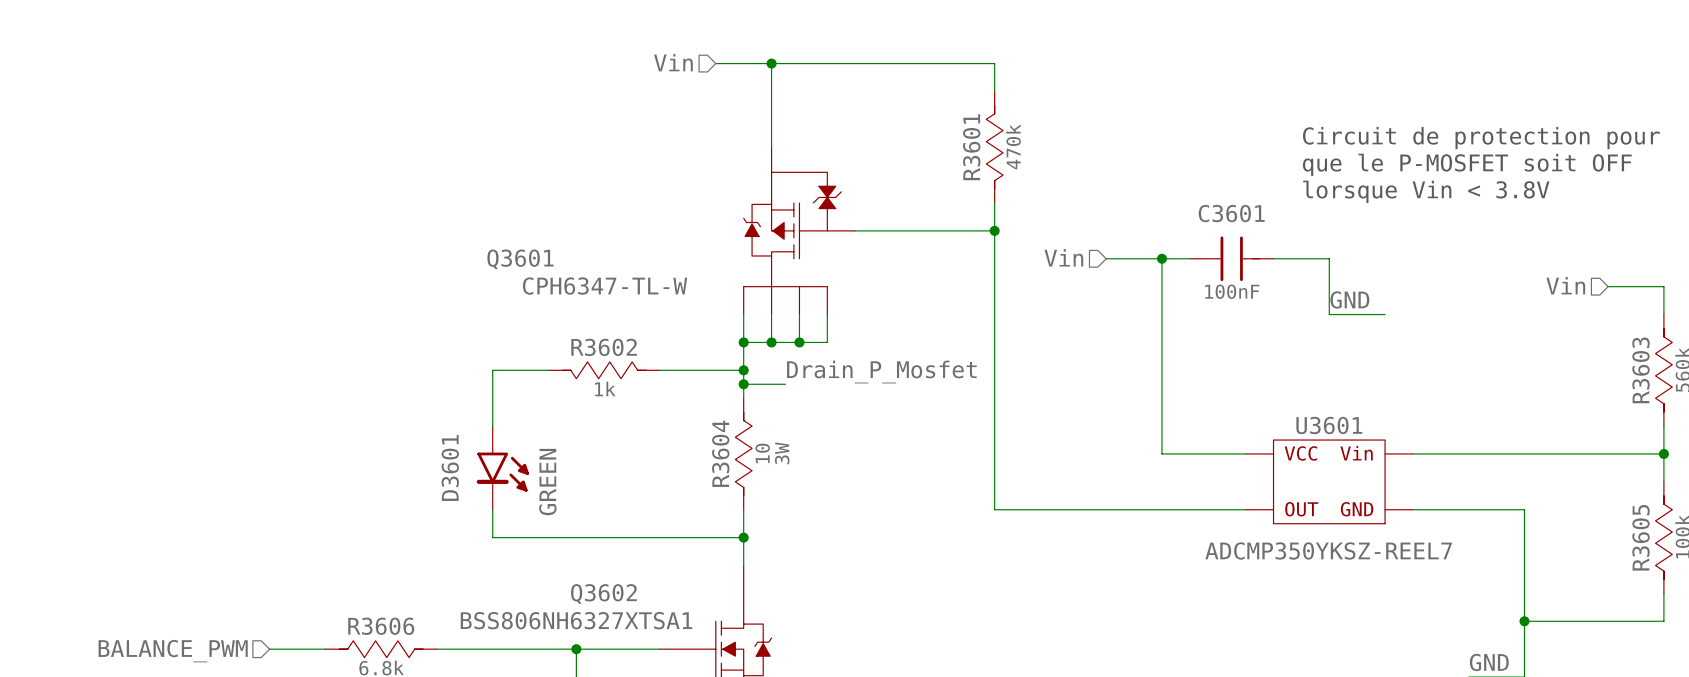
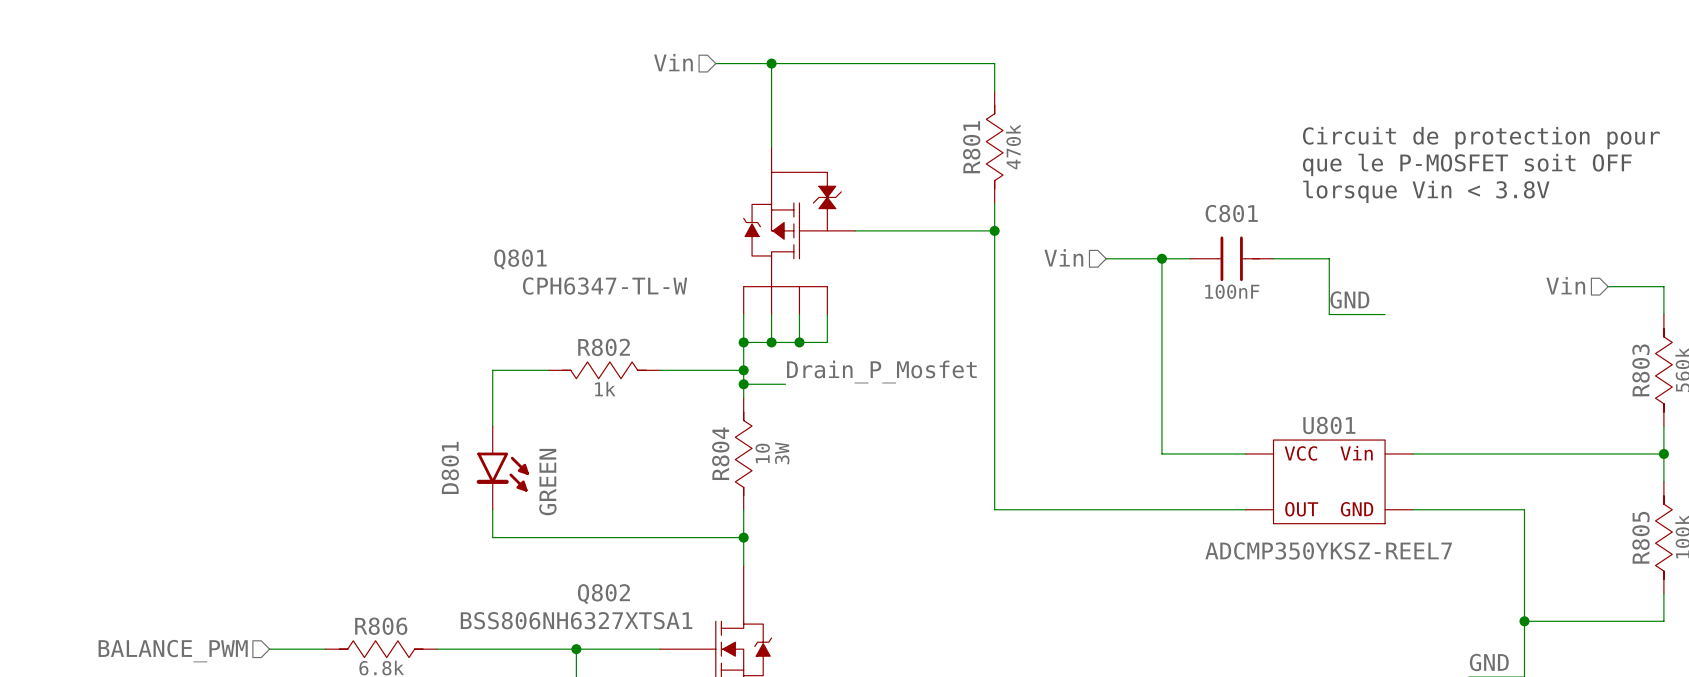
R3601 name: R3601 (971, 147) -> R801 (971, 147)
C3601 name: C3601 (1231, 213) -> C801 (1231, 213)
Q3601 name: Q3601 (520, 259) -> Q801 (520, 259)
R3602 name: R3602 (604, 347) -> R802 (604, 347)
R3603 name: R3603 (1640, 370) -> R803 (1640, 370)
U3601 name: U3601 (1329, 425) -> U801 (1329, 425)
R3604 name: R3604 (720, 453) -> R804 (720, 453)
D3601 name: D3601 (450, 467) -> D801 (450, 467)
R3605 name: R3605 (1640, 537) -> R805 (1640, 537)
Q3602 name: Q3602 (603, 594) -> Q802 (603, 594)
R3606 name: R3606 (381, 626) -> R806 (381, 626)

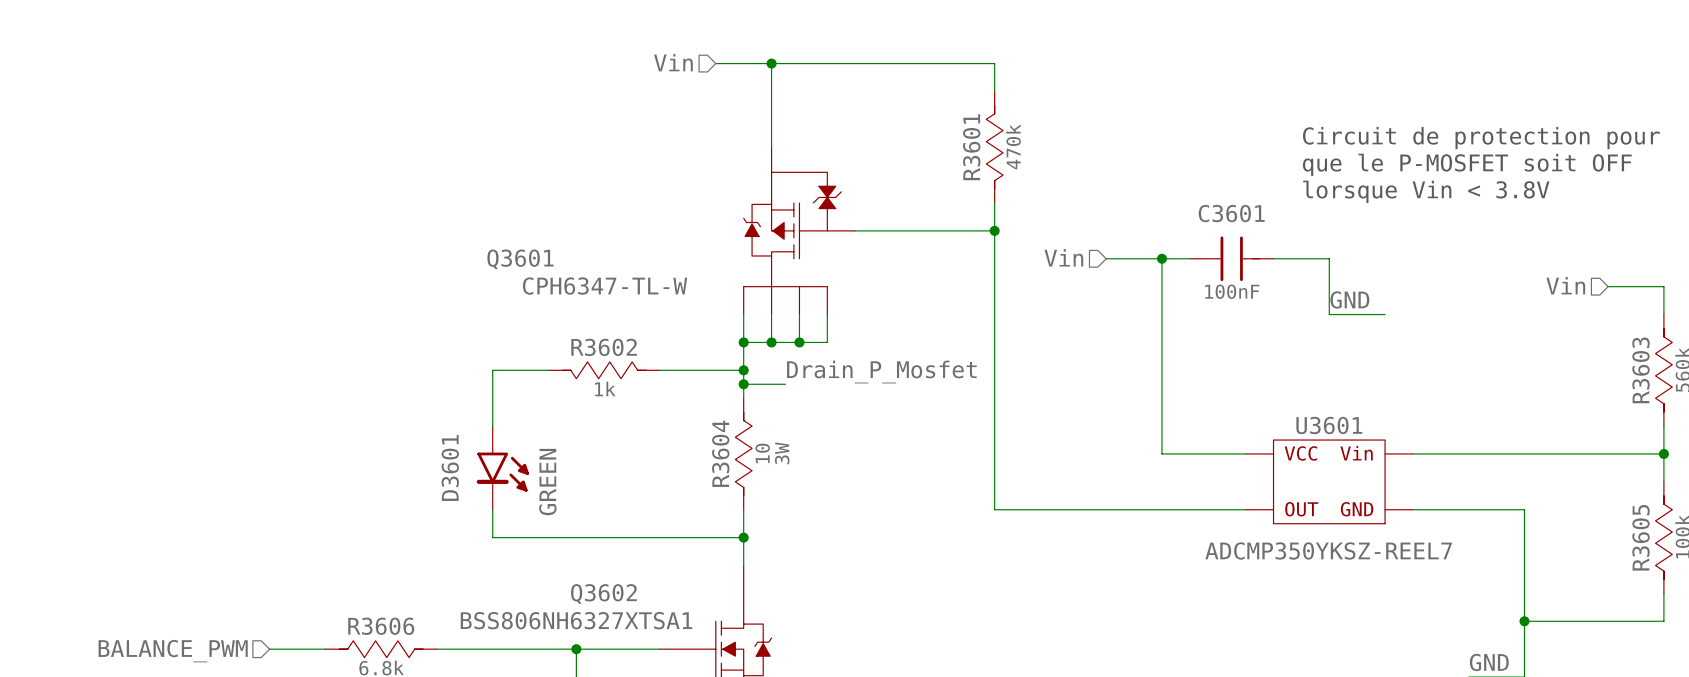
R801 name: R801 (971, 147) -> R3601 (971, 147)
C801 name: C801 (1231, 213) -> C3601 (1231, 213)
Q801 name: Q801 (520, 259) -> Q3601 (520, 259)
R802 name: R802 (604, 347) -> R3602 (604, 347)
R803 name: R803 (1640, 370) -> R3603 (1640, 370)
U801 name: U801 (1329, 425) -> U3601 (1329, 425)
R804 name: R804 (720, 453) -> R3604 (720, 453)
D801 name: D801 (450, 467) -> D3601 (450, 467)
R805 name: R805 (1640, 537) -> R3605 (1640, 537)
Q802 name: Q802 (603, 594) -> Q3602 (603, 594)
R806 name: R806 (381, 626) -> R3606 (381, 626)

